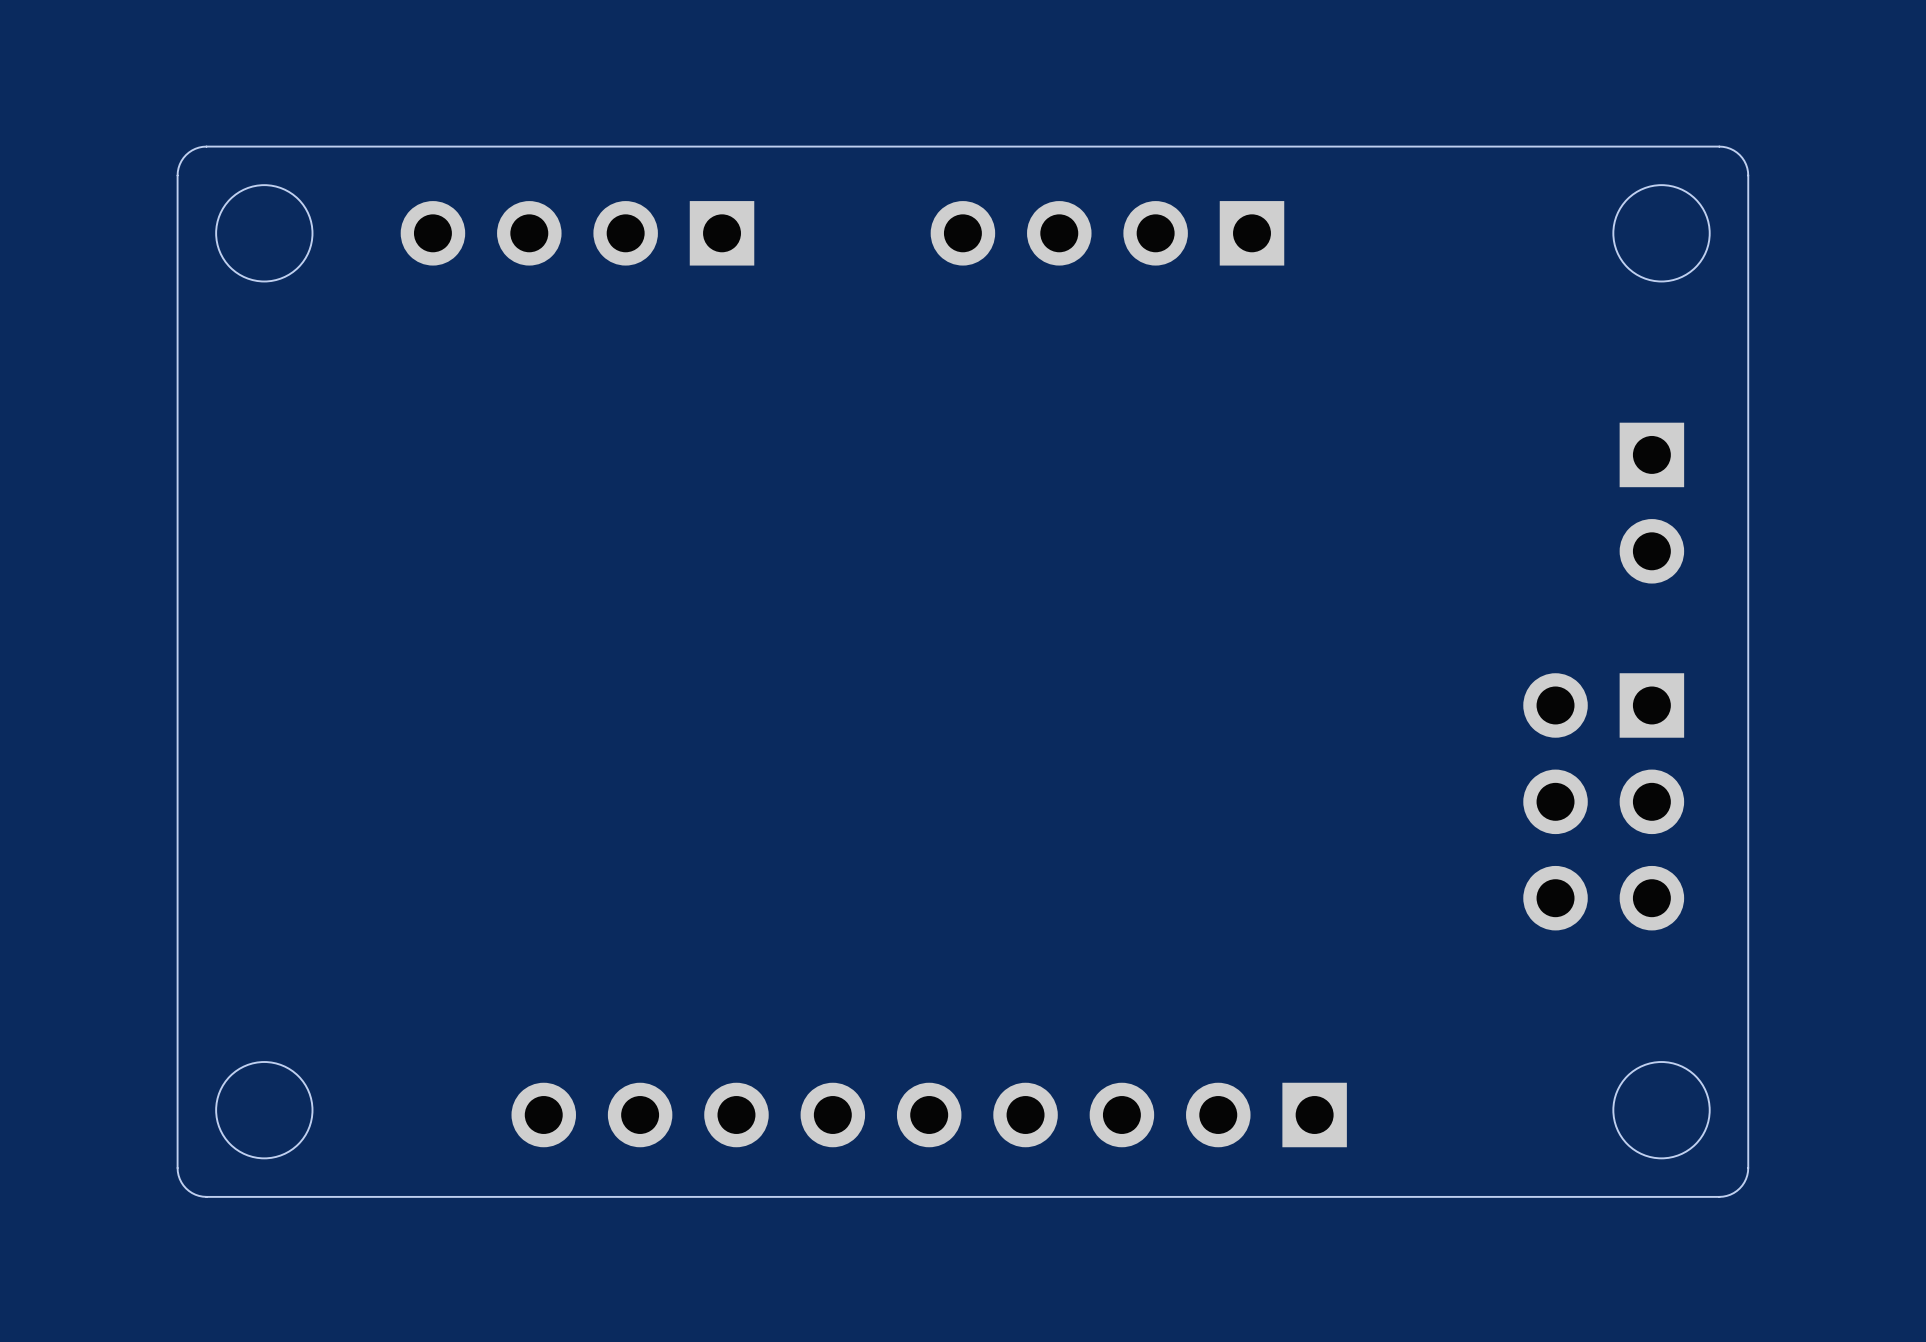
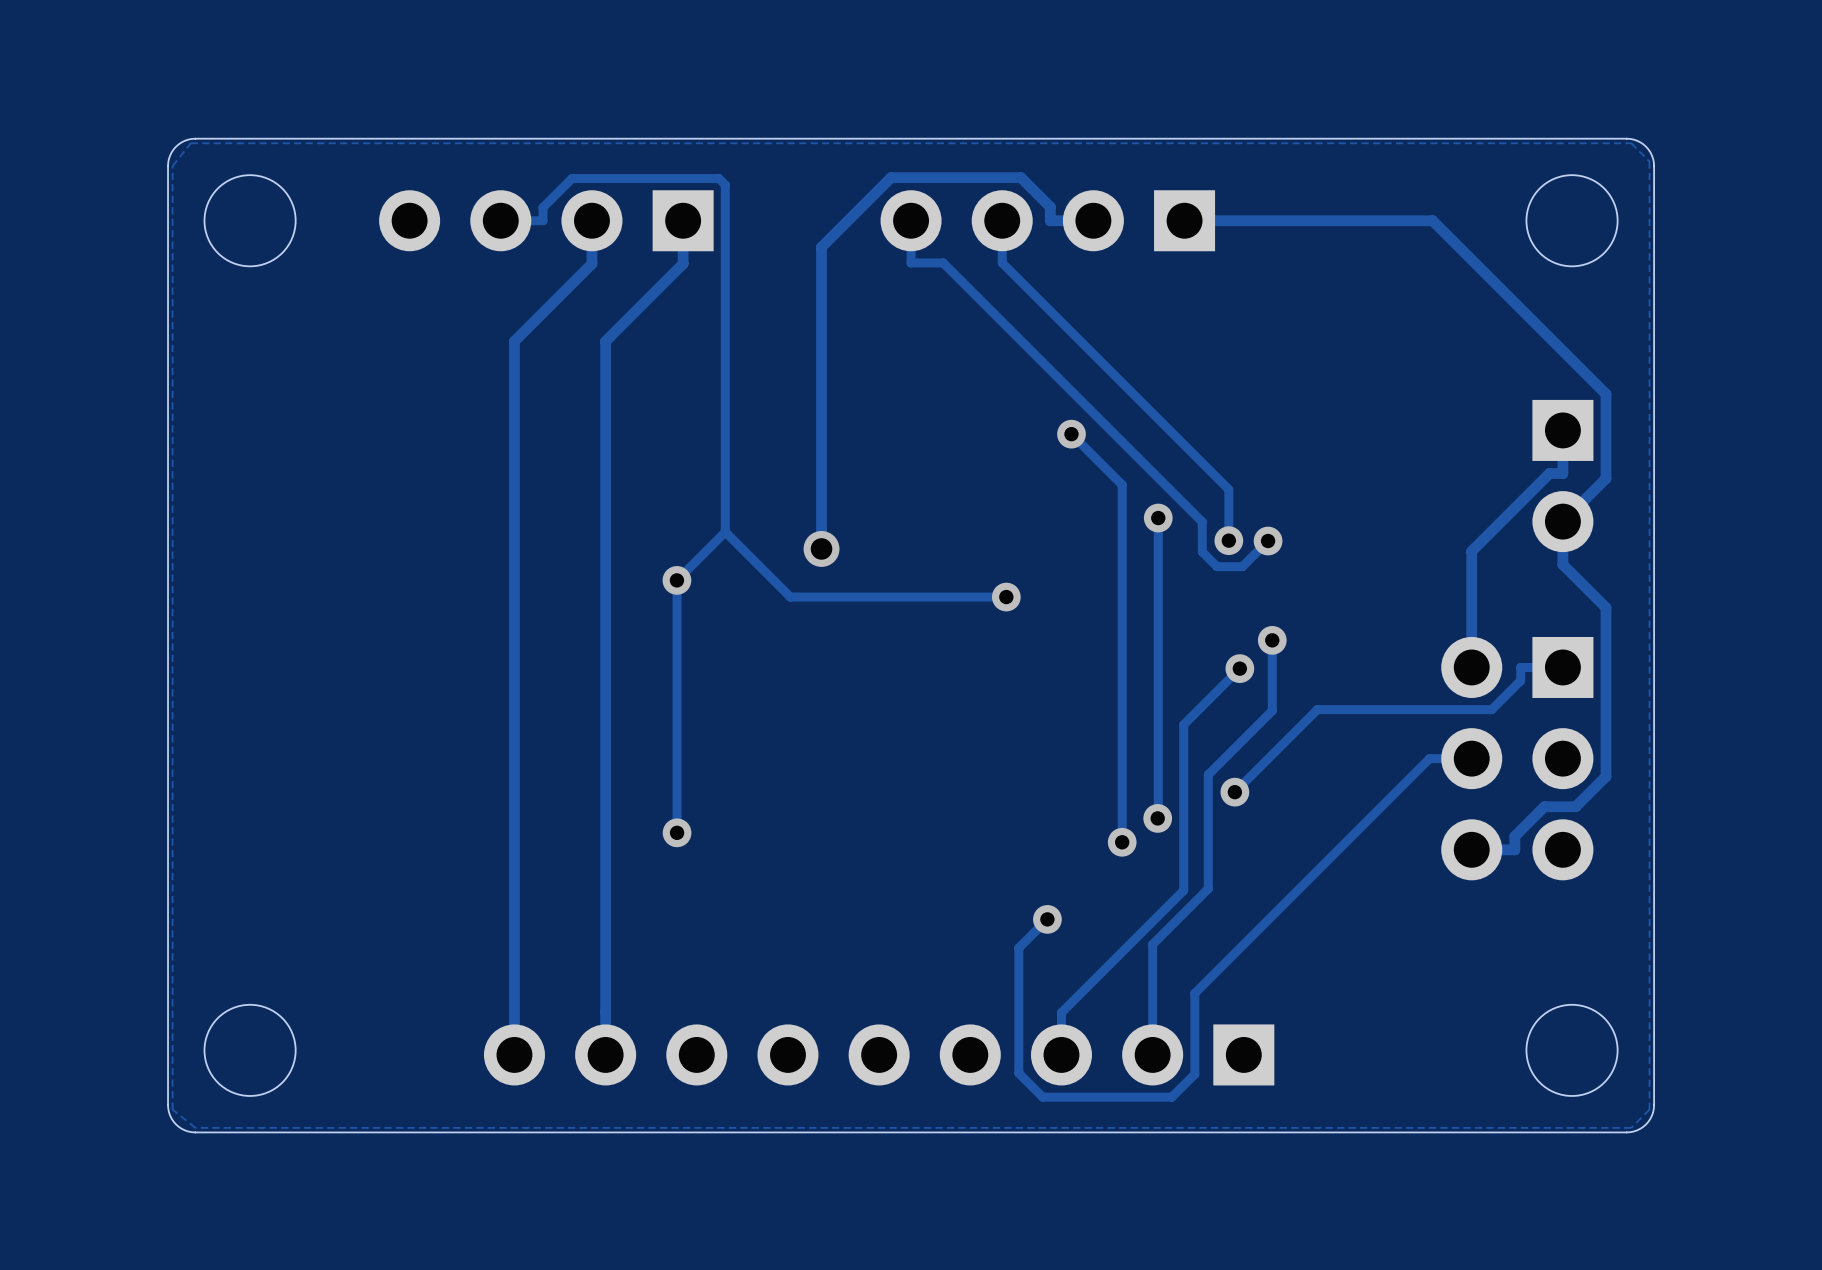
zone outline: none -> (1631, 143) (190, 143) (172, 166) (172, 1109) (195, 1127) (1631, 1127) (1649, 1109) (1649, 161) (1631, 143)
track: none -> (500, 220) (542, 220) (542, 207) (571, 178) (718, 178) (725, 184) (725, 532)
track: none -> (591, 220) (591, 263) (514, 341) (514, 1054)
track: none -> (683, 220) (683, 263) (605, 341) (605, 1054)
track: none -> (911, 220) (911, 262) (943, 262) (1202, 521) (1202, 551) (1217, 566) (1242, 566) (1268, 541)
track: none -> (1002, 220) (1002, 262) (1228, 489) (1228, 540)
track: none -> (1093, 220) (1050, 220) (1050, 206) (1020, 177) (891, 177) (821, 247) (821, 548)
track: none -> (1184, 220) (1432, 220) (1606, 394) (1606, 478) (1562, 521) (1562, 564) (1606, 607) (1606, 776) (1575, 806) (1544, 806) (1514, 836) (1514, 849) (1471, 849)
track: none -> (1562, 430) (1562, 473) (1549, 473) (1471, 551) (1471, 667)
track: none -> (1071, 434) (1122, 484) (1122, 842)
via: none -> (1071, 434)
track: none -> (1158, 518) (1157, 818)
via: none -> (1158, 518)
track: none -> (725, 532) (676, 580)
track: none -> (725, 532) (790, 597) (1006, 597)
via: none -> (1228, 540)
via: none -> (1268, 541)
via: none -> (821, 548)
track: none -> (677, 580) (677, 832)
via: none -> (676, 580)
via: none -> (1006, 597)
track: none -> (1272, 640) (1272, 710) (1208, 774) (1208, 888) (1152, 944) (1152, 1054)
via: none -> (1272, 640)
track: none -> (1562, 667) (1520, 667) (1520, 680) (1491, 709) (1317, 709) (1234, 792)
track: none -> (1239, 668) (1183, 724) (1183, 890) (1061, 1012) (1061, 1054)
via: none -> (1239, 668)
track: none -> (1471, 758) (1429, 758) (1194, 993) (1194, 1074) (1171, 1097) (1042, 1097) (1018, 1073) (1018, 947) (1047, 919)
via: none -> (1234, 792)
via: none -> (1157, 818)
via: none -> (677, 832)
via: none -> (1122, 842)
via: none -> (1047, 919)

